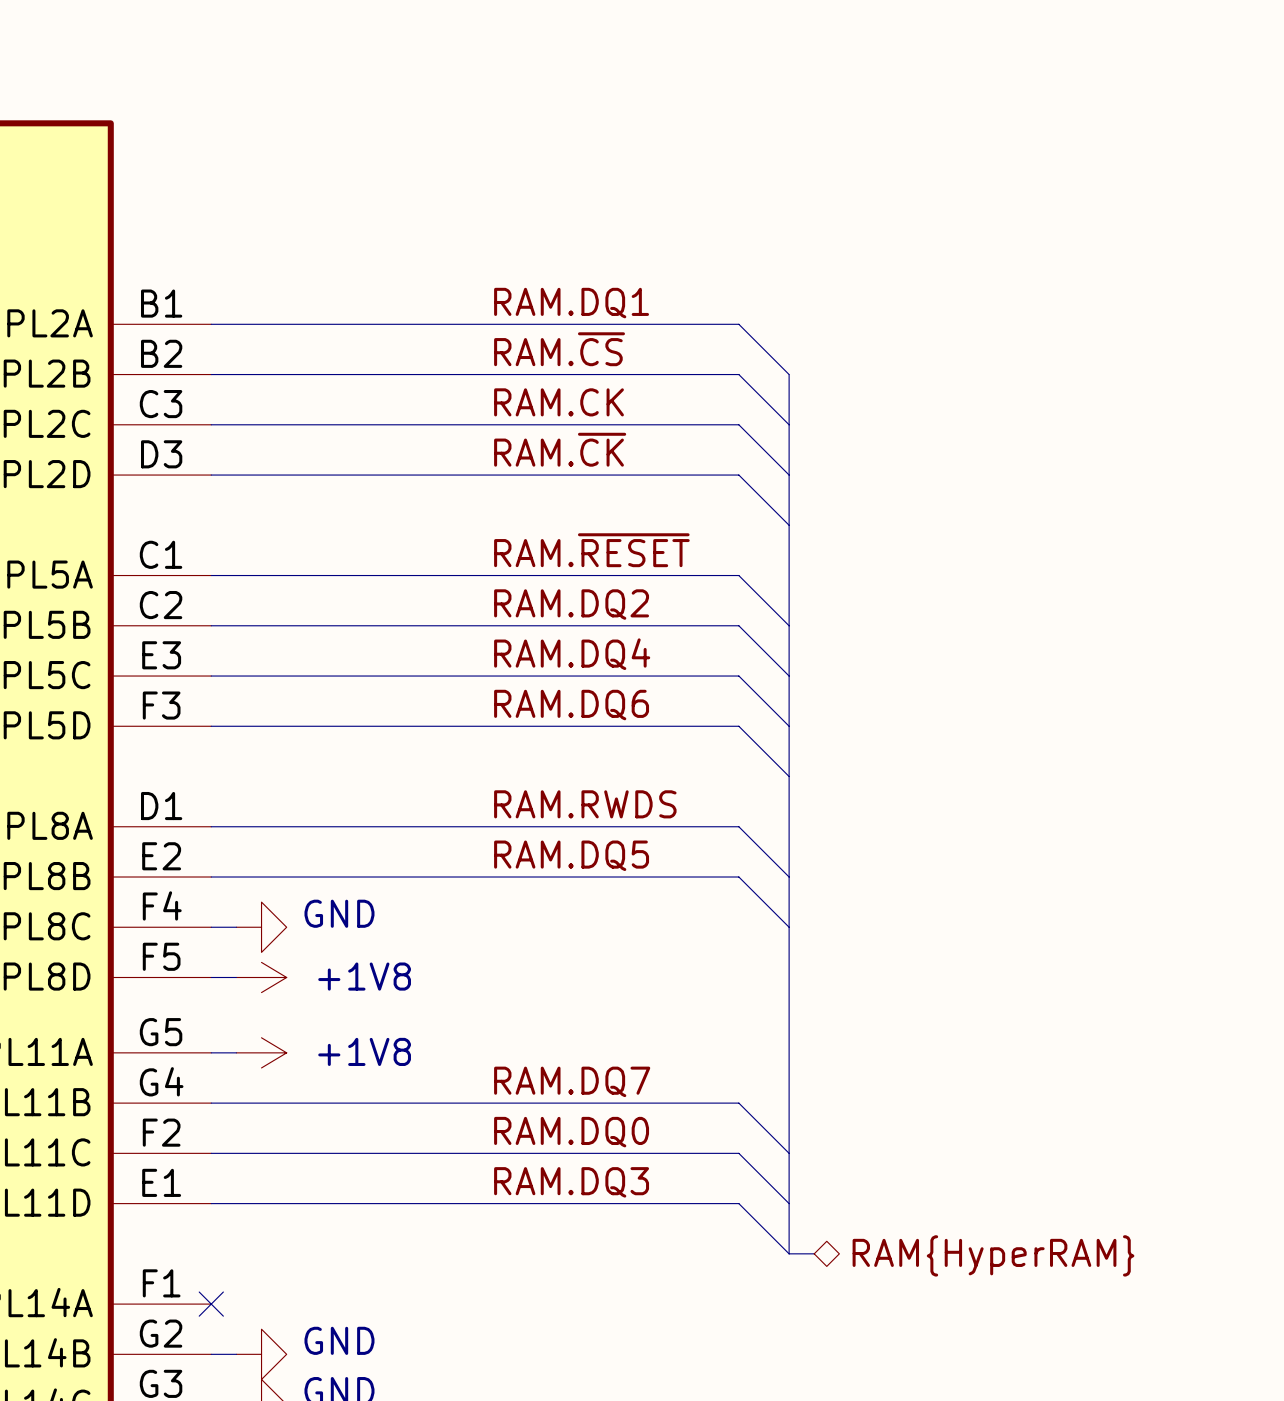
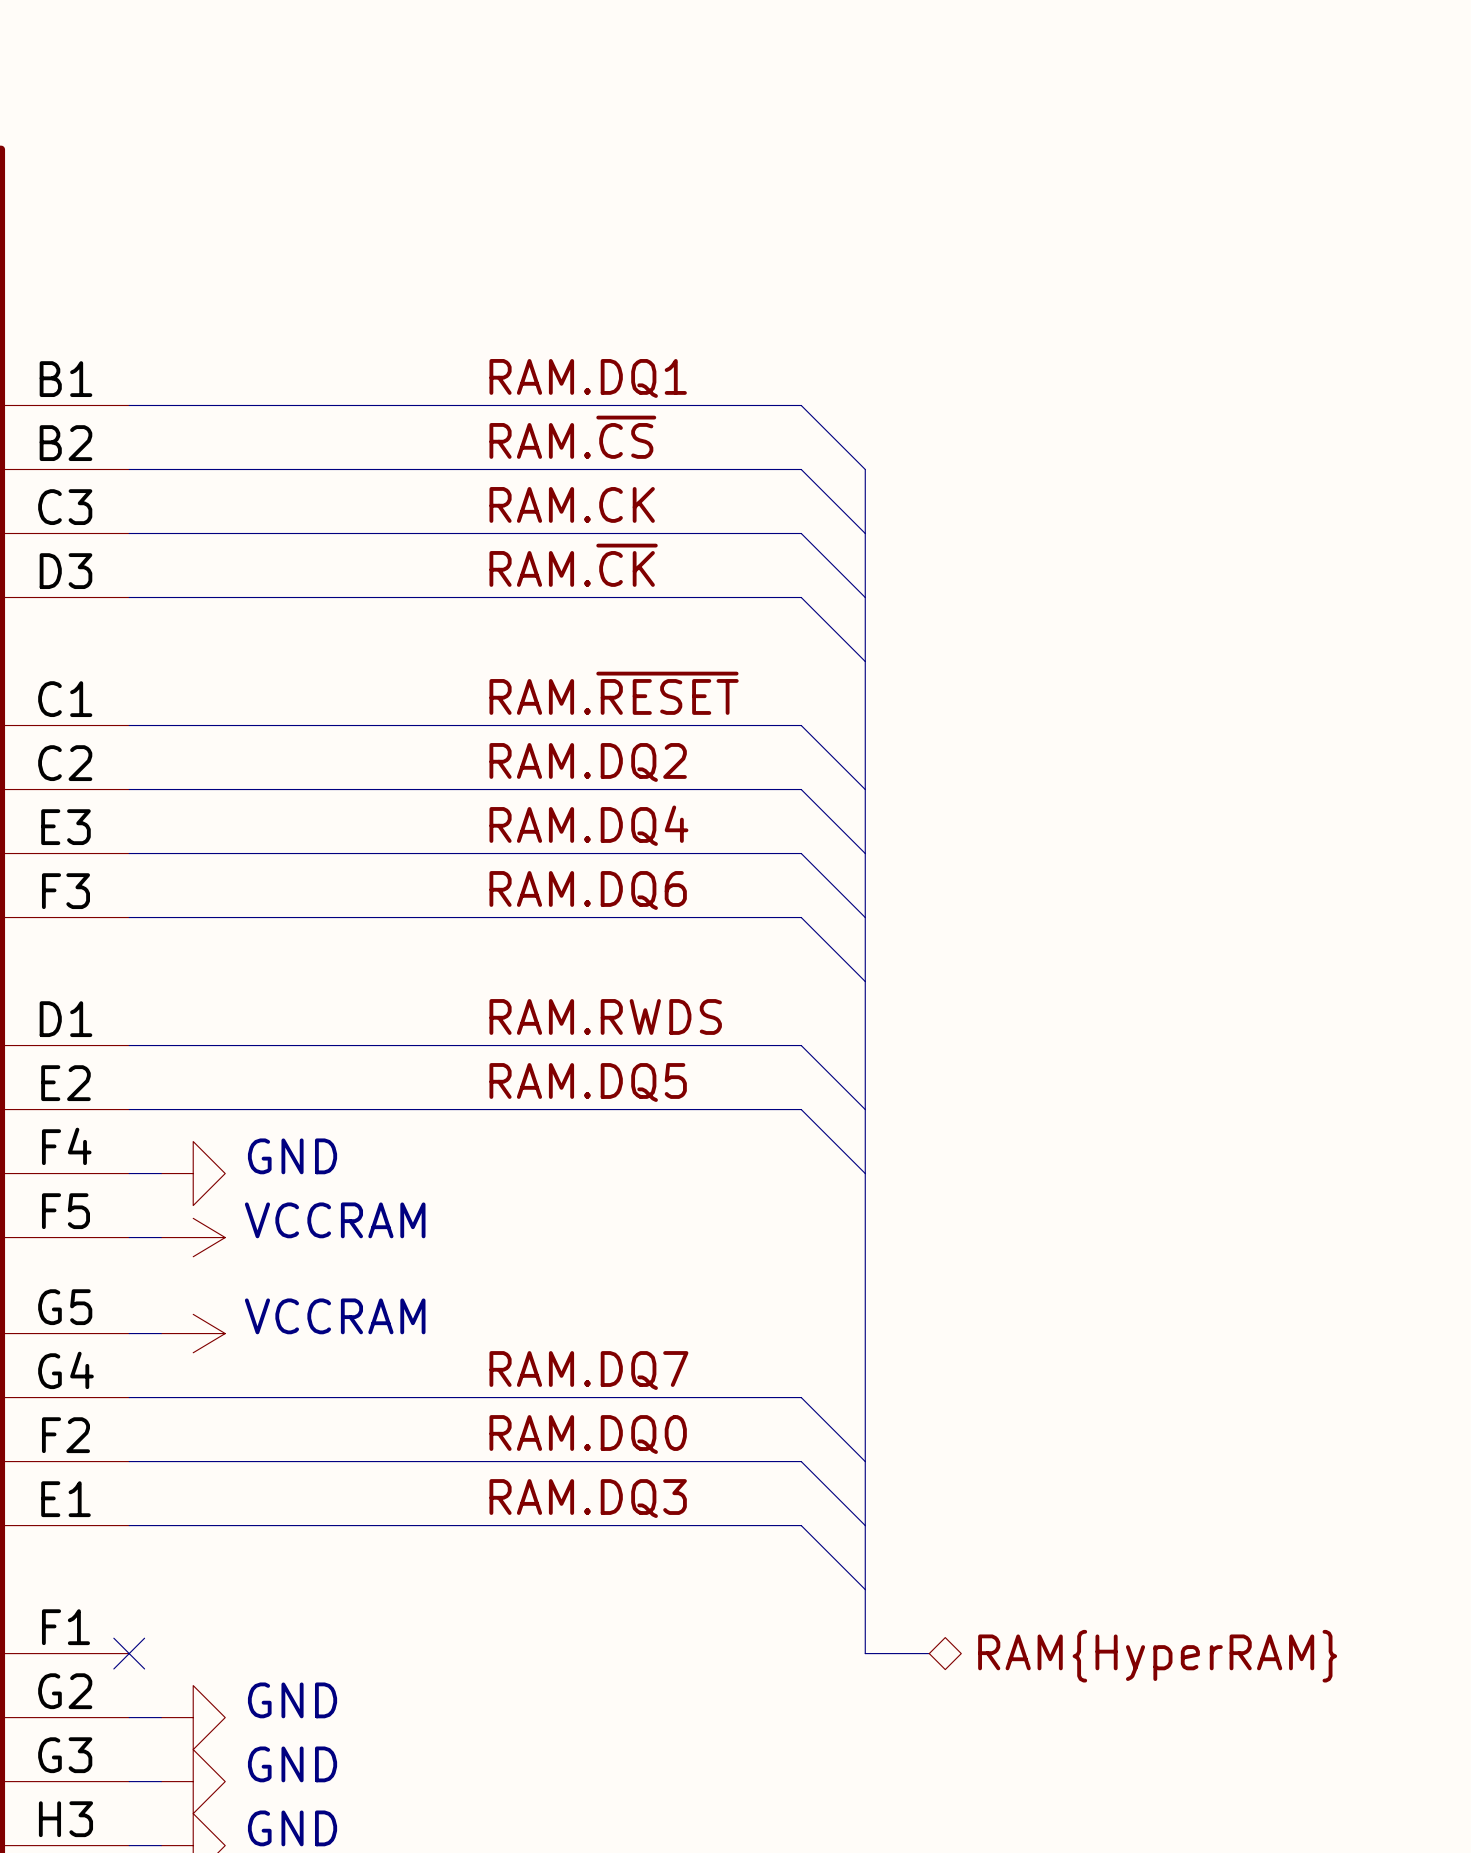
power symbol: +1V8 (261, 977) -> VCCRAM (193, 1237)
power symbol: +1V8 (261, 1052) -> VCCRAM (193, 1333)
bus: (789, 1253) (814, 1253) -> (865, 1589) (865, 1653) (929, 1653)
hierarchical label position: RAM{HyperRAM} (993, 1255) -> RAM{HyperRAM} (1157, 1656)

